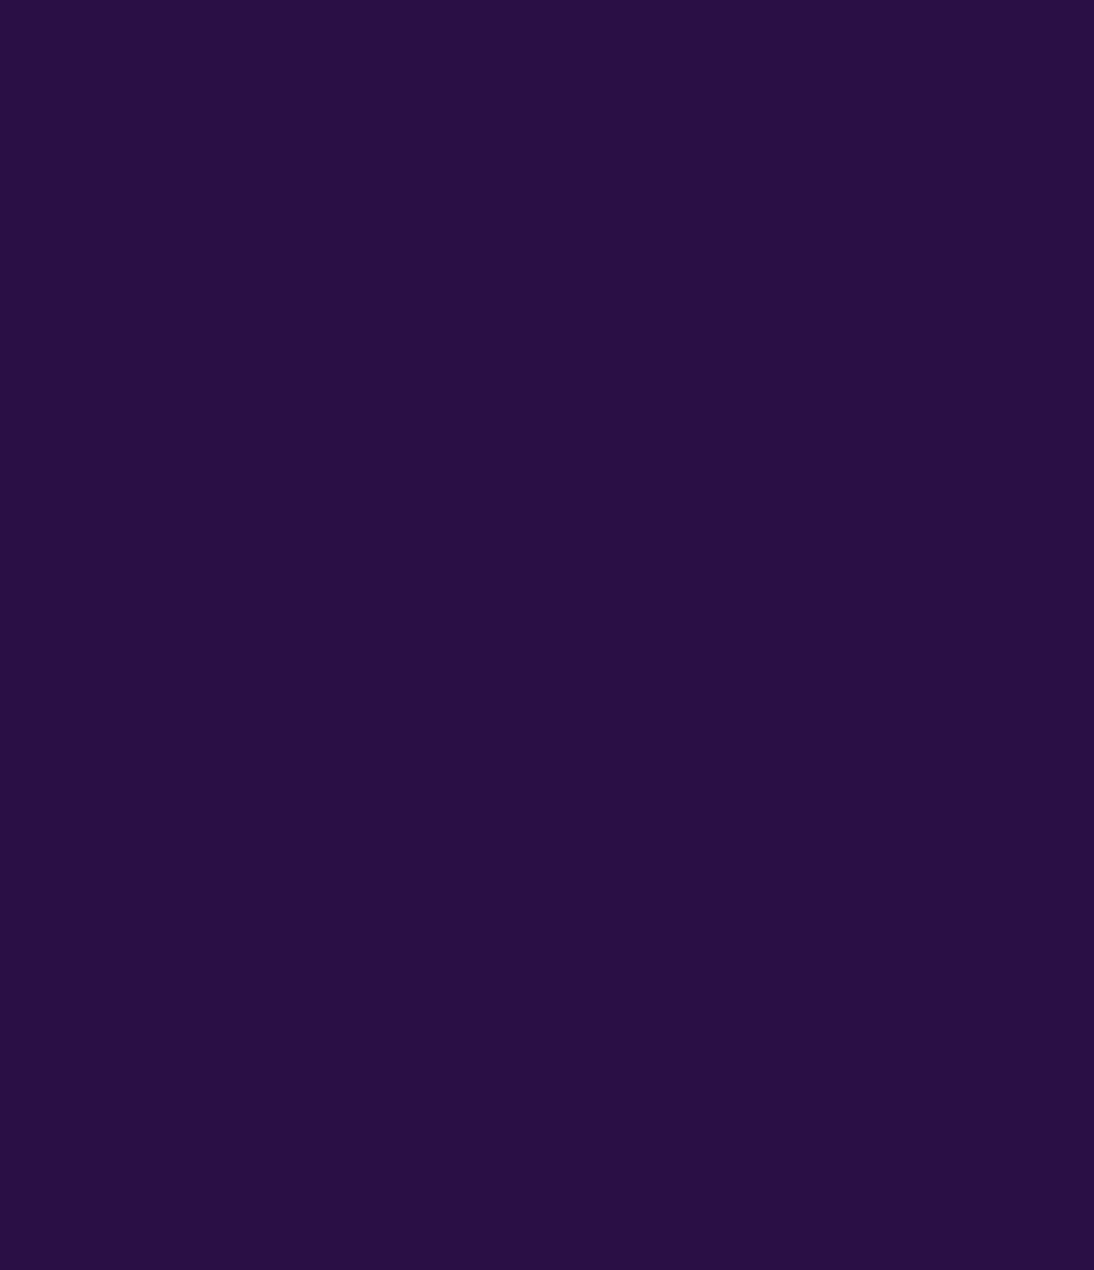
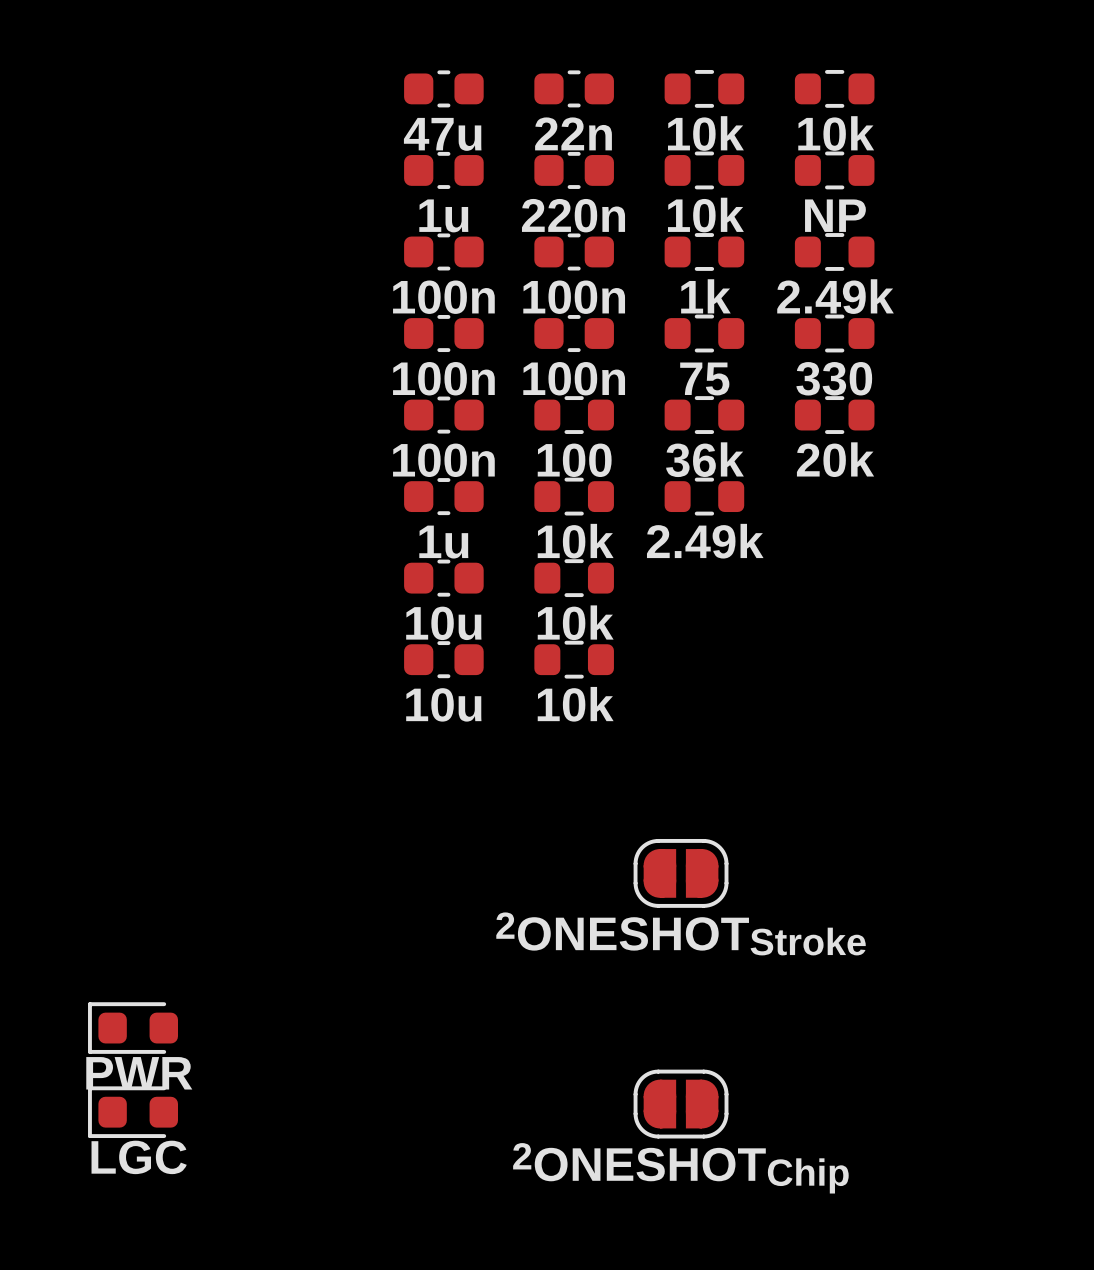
part: none -> 47u (443, 88)
part: none -> 22n (574, 88)
part: none -> 10k (704, 88)
part: none -> 10k (834, 88)
part: none -> 1u (443, 170)
part: none -> 220n (574, 170)
part: none -> 10k (704, 170)
part: none -> NP (834, 170)
part: none -> 100n (443, 251)
part: none -> 100n (574, 251)
part: none -> 1k (704, 251)
part: none -> 2.49k (834, 251)
part: none -> 100n (443, 333)
part: none -> 100n (574, 333)
part: none -> 75 (704, 333)
part: none -> 330 (834, 333)
part: none -> 100n (443, 415)
part: none -> 100 (574, 415)
part: none -> 36k (704, 415)
part: none -> 20k (834, 415)
part: none -> 1u (443, 496)
part: none -> 10k (574, 496)
part: none -> 2.49k (704, 496)
part: none -> 10u (443, 578)
part: none -> 10k (574, 578)
part: none -> 10u (443, 659)
part: none -> 10k (574, 659)
part: none -> 2ONESHOTStroke (681, 873)
part: none -> PWR (133, 1028)
part: none -> 2ONESHOTChip (681, 1104)
part: none -> LGC (133, 1112)

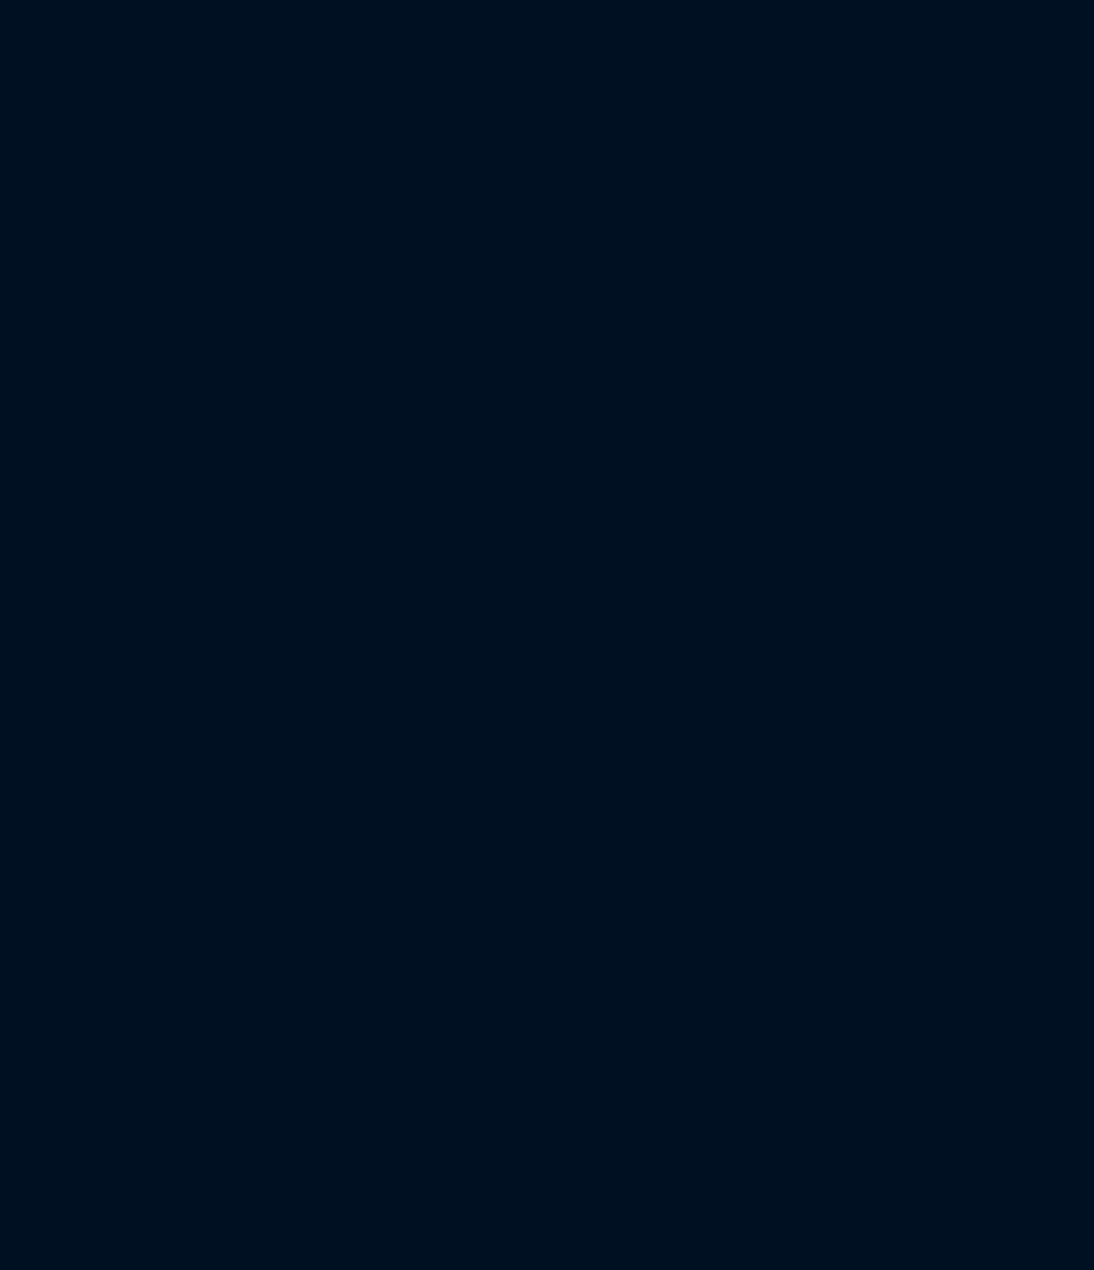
part: 47u (443, 88) -> none
part: 22n (574, 88) -> none
part: 10k (704, 88) -> none
part: 10k (834, 88) -> none
part: 1u (443, 170) -> none
part: 220n (574, 170) -> none
part: 10k (704, 170) -> none
part: NP (834, 170) -> none
part: 100n (443, 251) -> none
part: 100n (574, 251) -> none
part: 1k (704, 251) -> none
part: 2.49k (834, 251) -> none
part: 100n (443, 333) -> none
part: 100n (574, 333) -> none
part: 75 (704, 333) -> none
part: 330 (834, 333) -> none
part: 100n (443, 415) -> none
part: 100 (574, 415) -> none
part: 36k (704, 415) -> none
part: 20k (834, 415) -> none
part: 1u (443, 496) -> none
part: 10k (574, 496) -> none
part: 2.49k (704, 496) -> none
part: 10u (443, 578) -> none
part: 10k (574, 578) -> none
part: 10u (443, 659) -> none
part: 10k (574, 659) -> none
part: 2ONESHOTStroke (681, 873) -> none
part: PWR (133, 1028) -> none
part: 2ONESHOTChip (681, 1104) -> none
part: LGC (133, 1112) -> none

